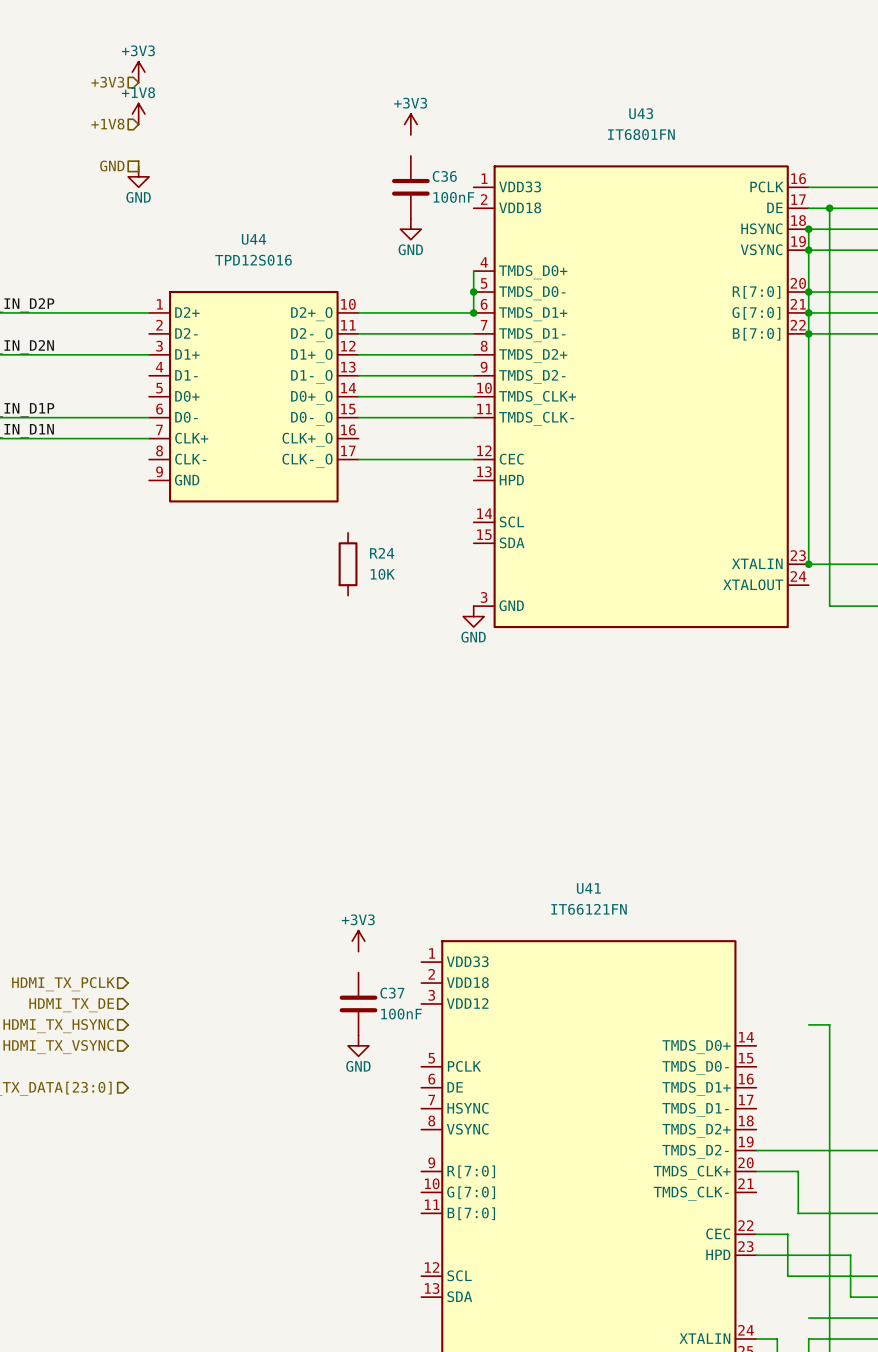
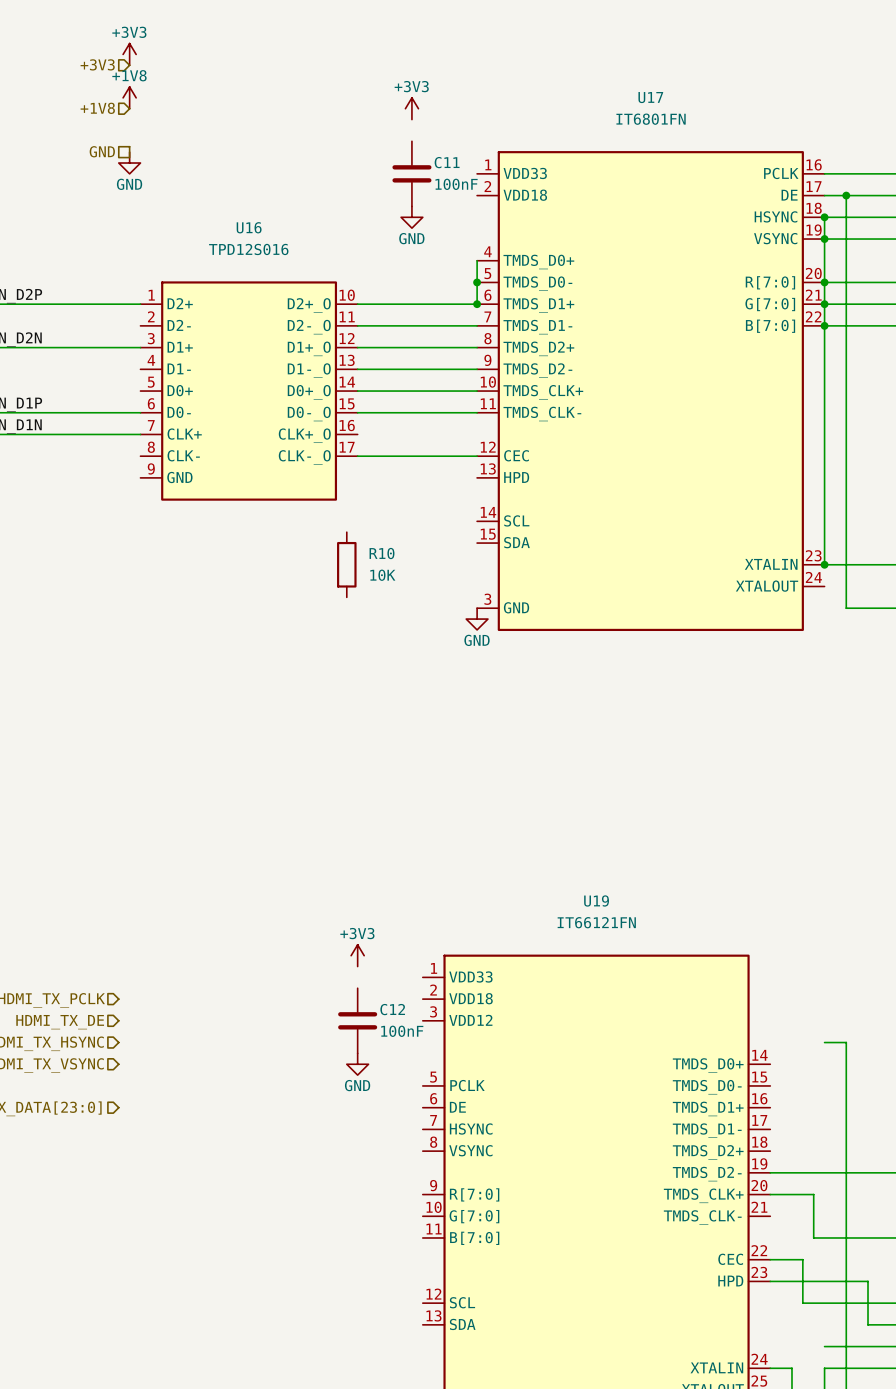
U43 name: U43 (641, 113) -> U17 (650, 97)
C36 name: C36 (444, 176) -> C11 (447, 162)
U44 name: U44 (253, 239) -> U16 (249, 227)
R24 name: R24 (382, 553) -> R10 (382, 553)
U41 name: U41 (588, 888) -> U19 (596, 900)
C37 name: C37 (392, 993) -> C12 (392, 1009)

